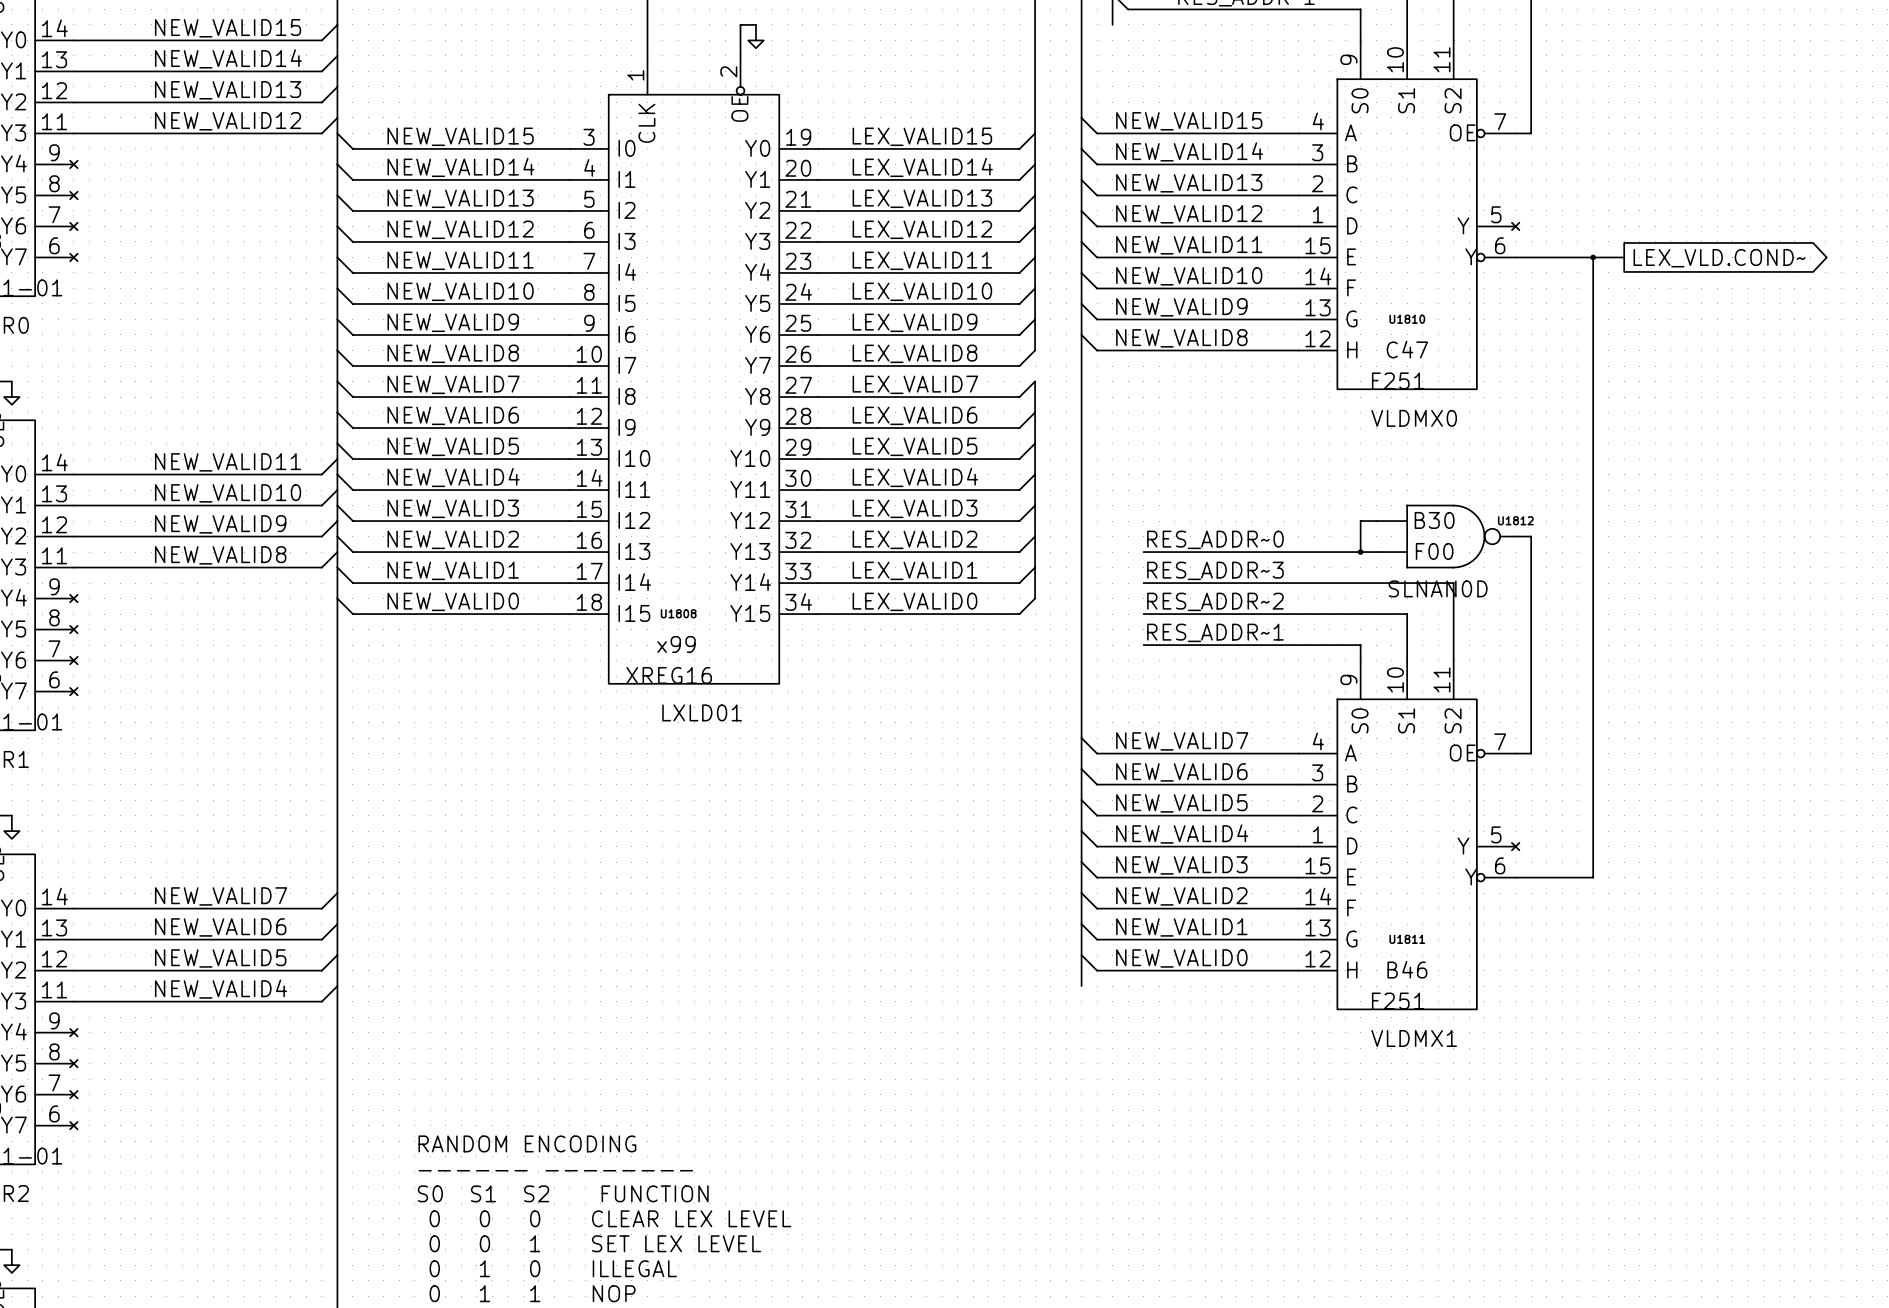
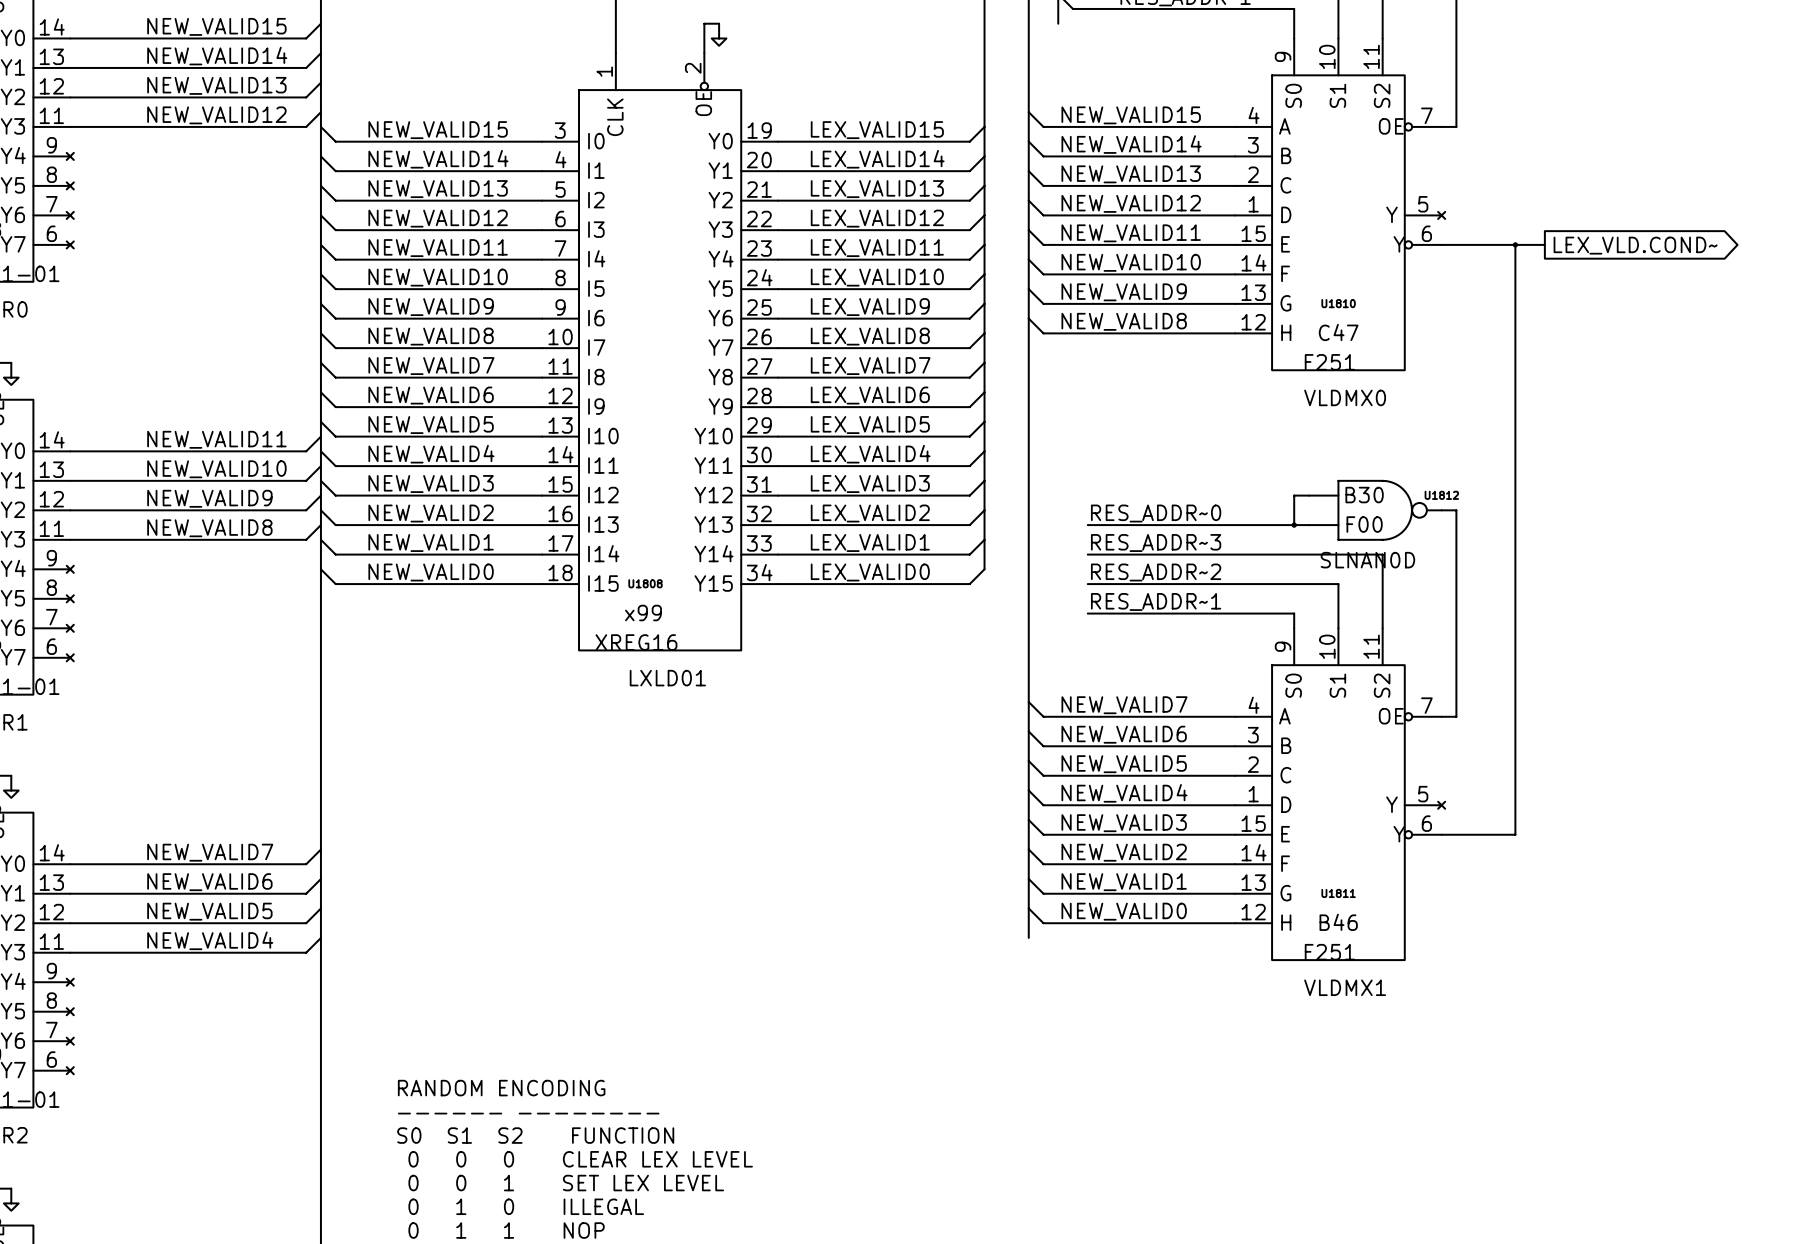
bus: none -> (984, 333) (984, 362)

